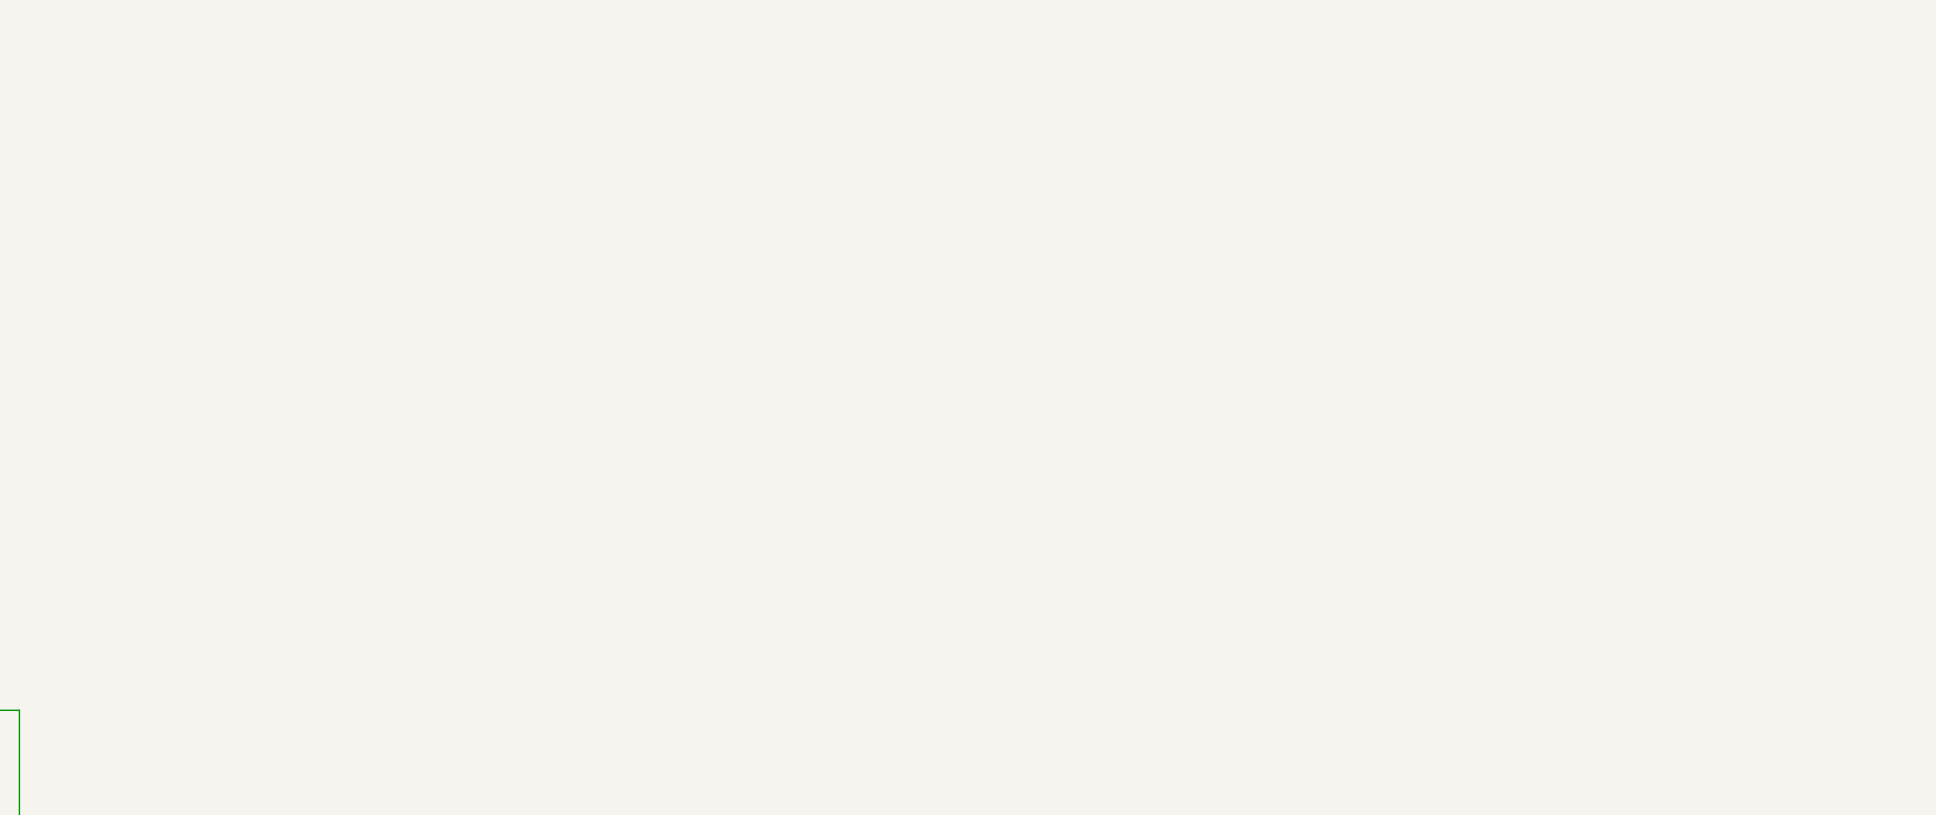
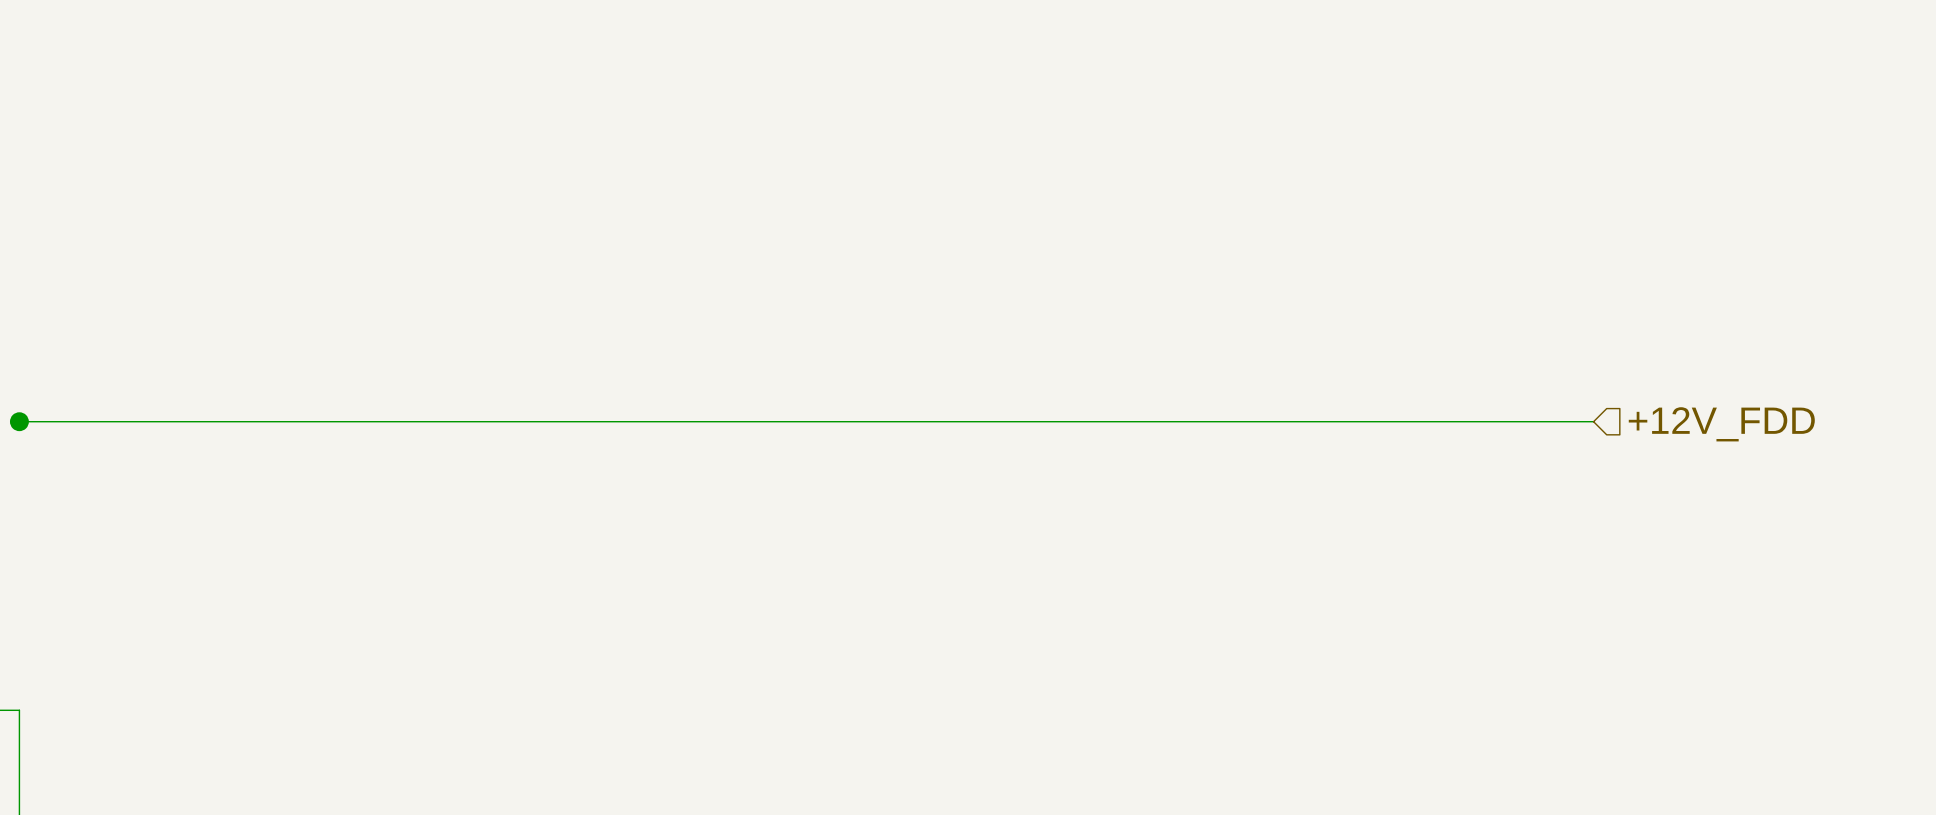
wire: none -> (19, 421) (1593, 421)
junction: none -> (19, 421)
hierarchical label: none -> +12V_FDD (1721, 424)

